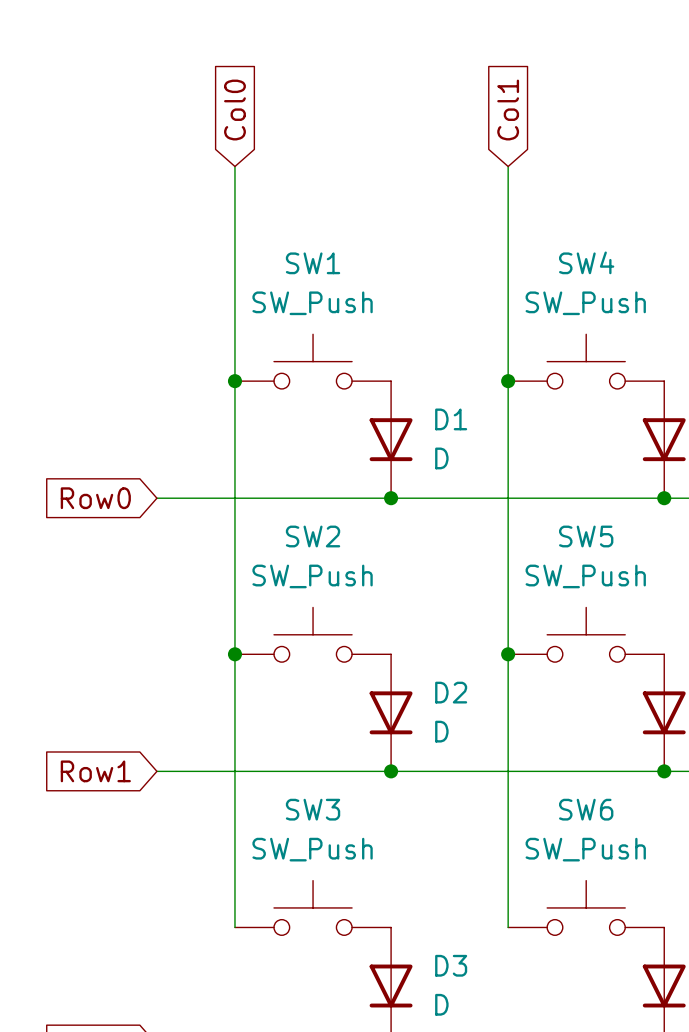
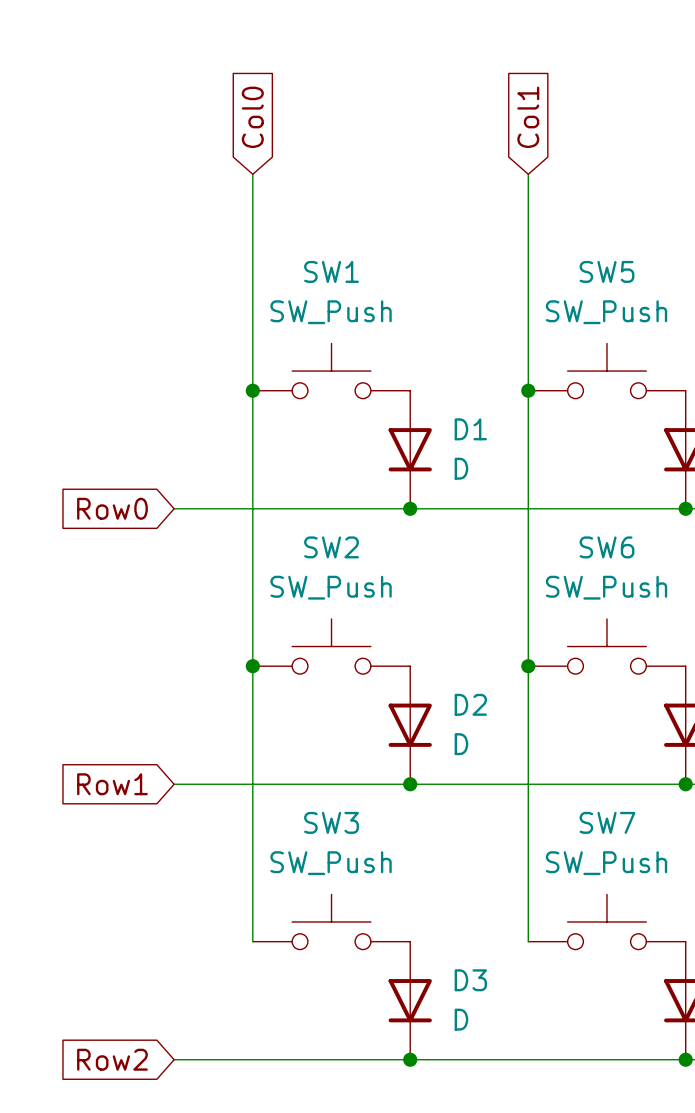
SW4 name: SW4 (586, 262) -> SW5 (606, 271)
SW5 name: SW5 (586, 536) -> SW6 (606, 547)
SW6 name: SW6 (586, 809) -> SW7 (607, 822)

